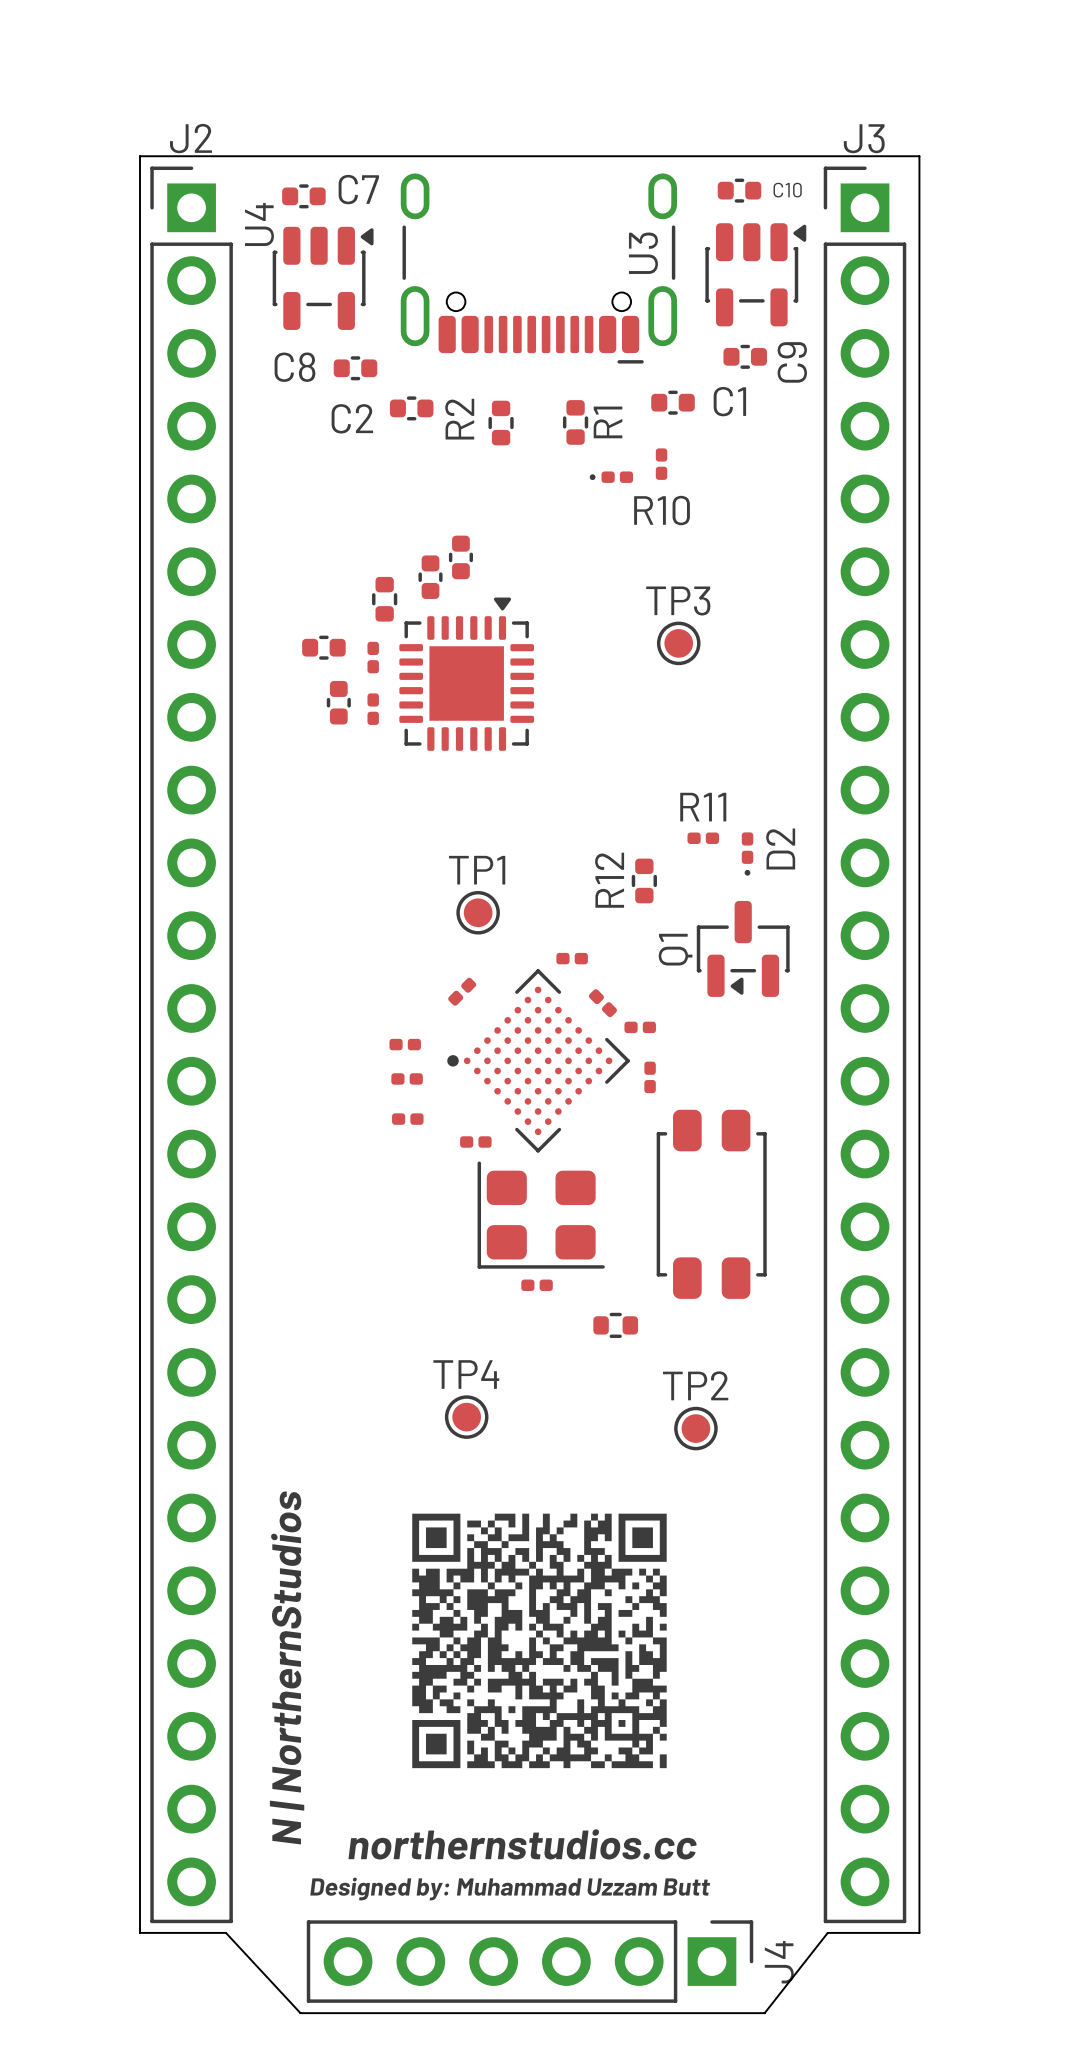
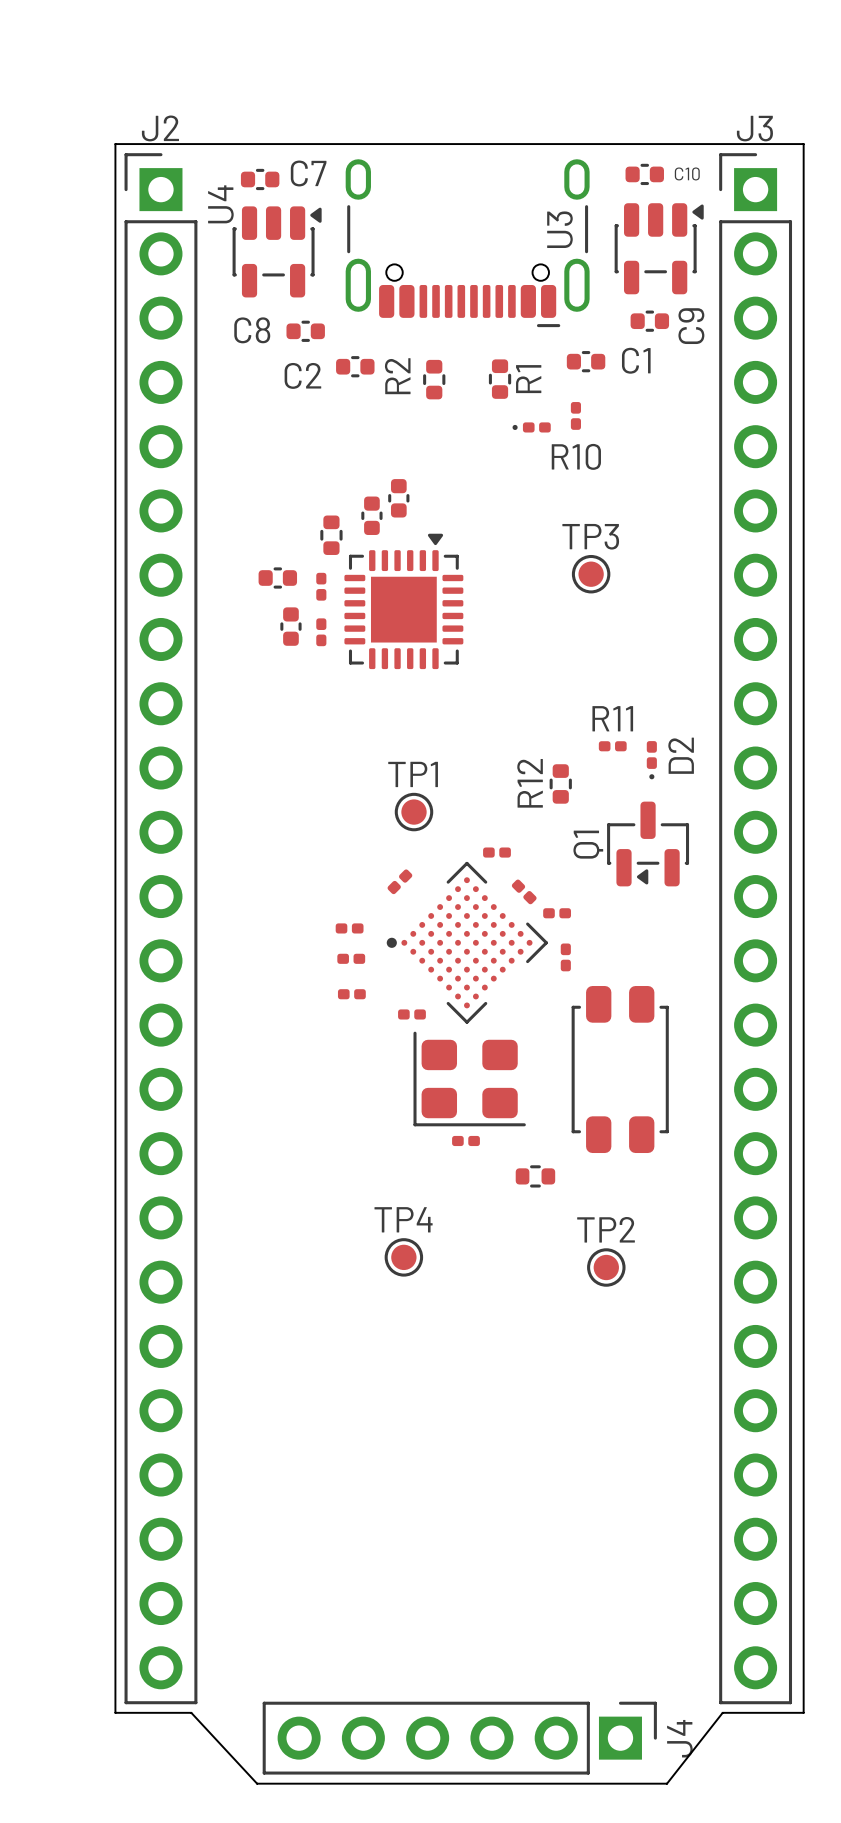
drawing: [412, 1513, 667, 1769] -> none
text: N | NorthernStudios (287, 1667) -> none
text: northernstudios.cc (522, 1844) -> none
text: Designed by: Muhammad Uzzam Butt (510, 1889) -> none

